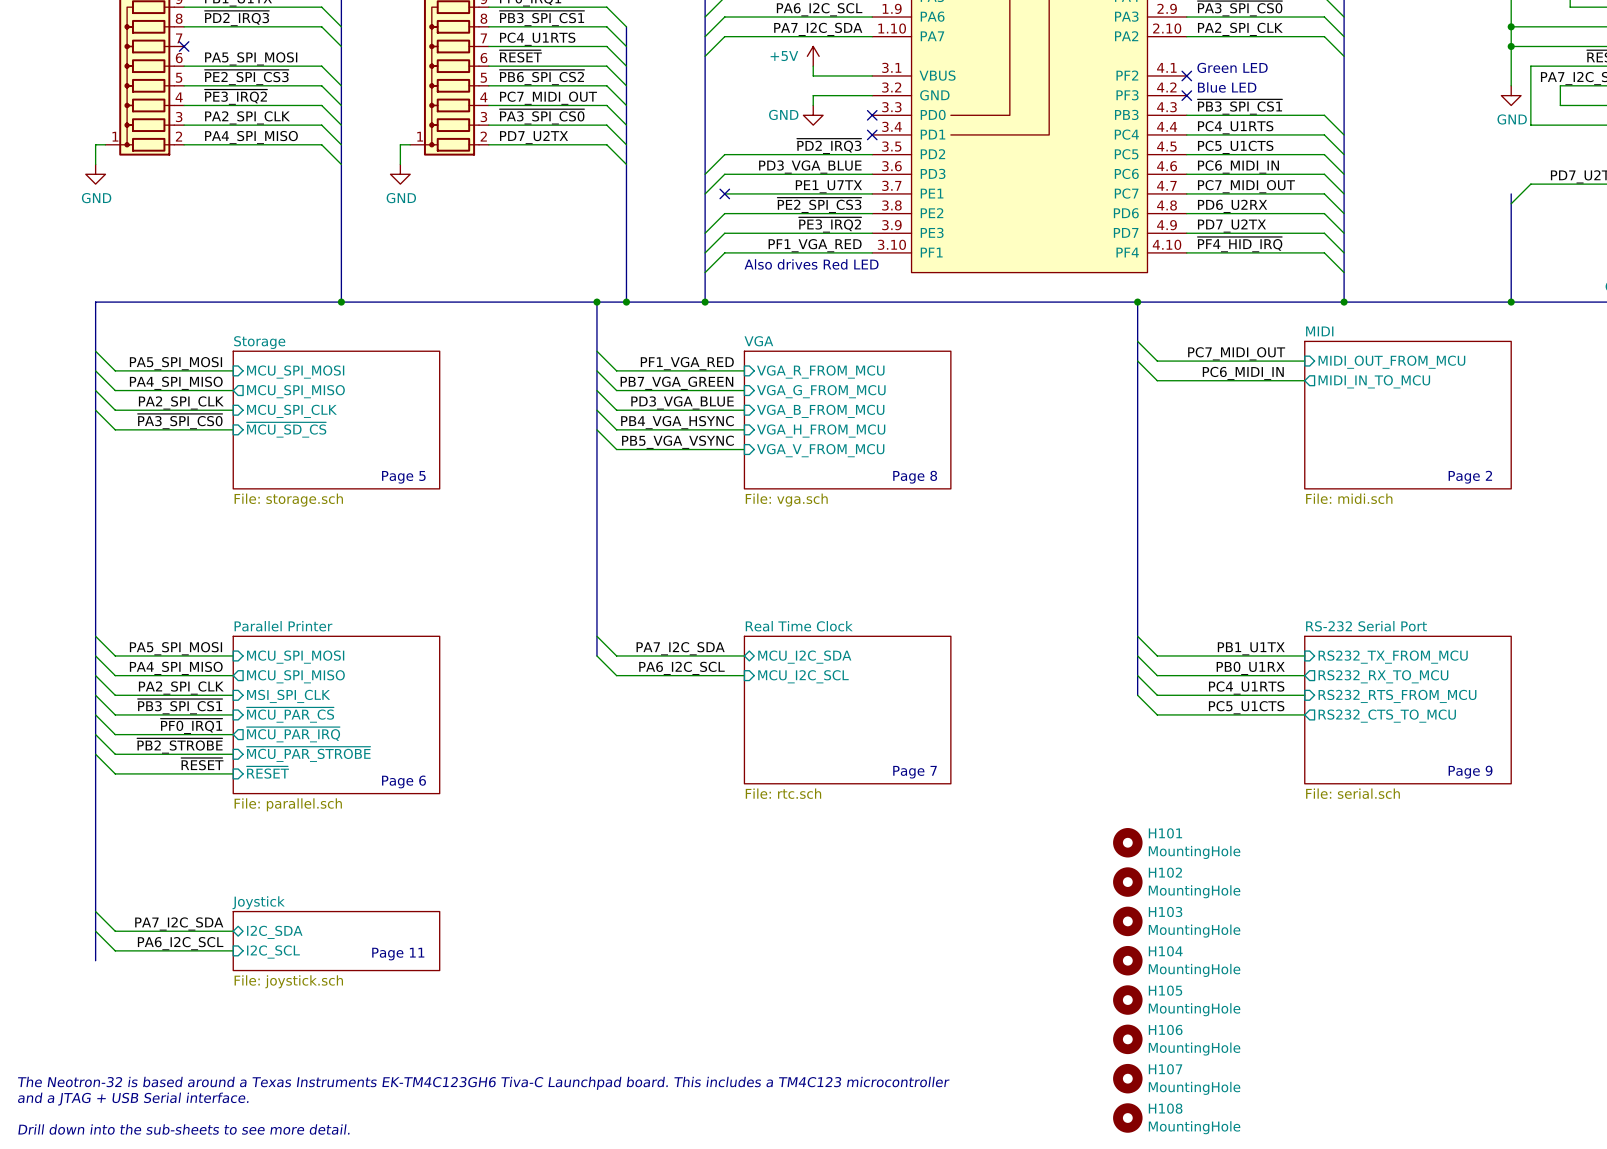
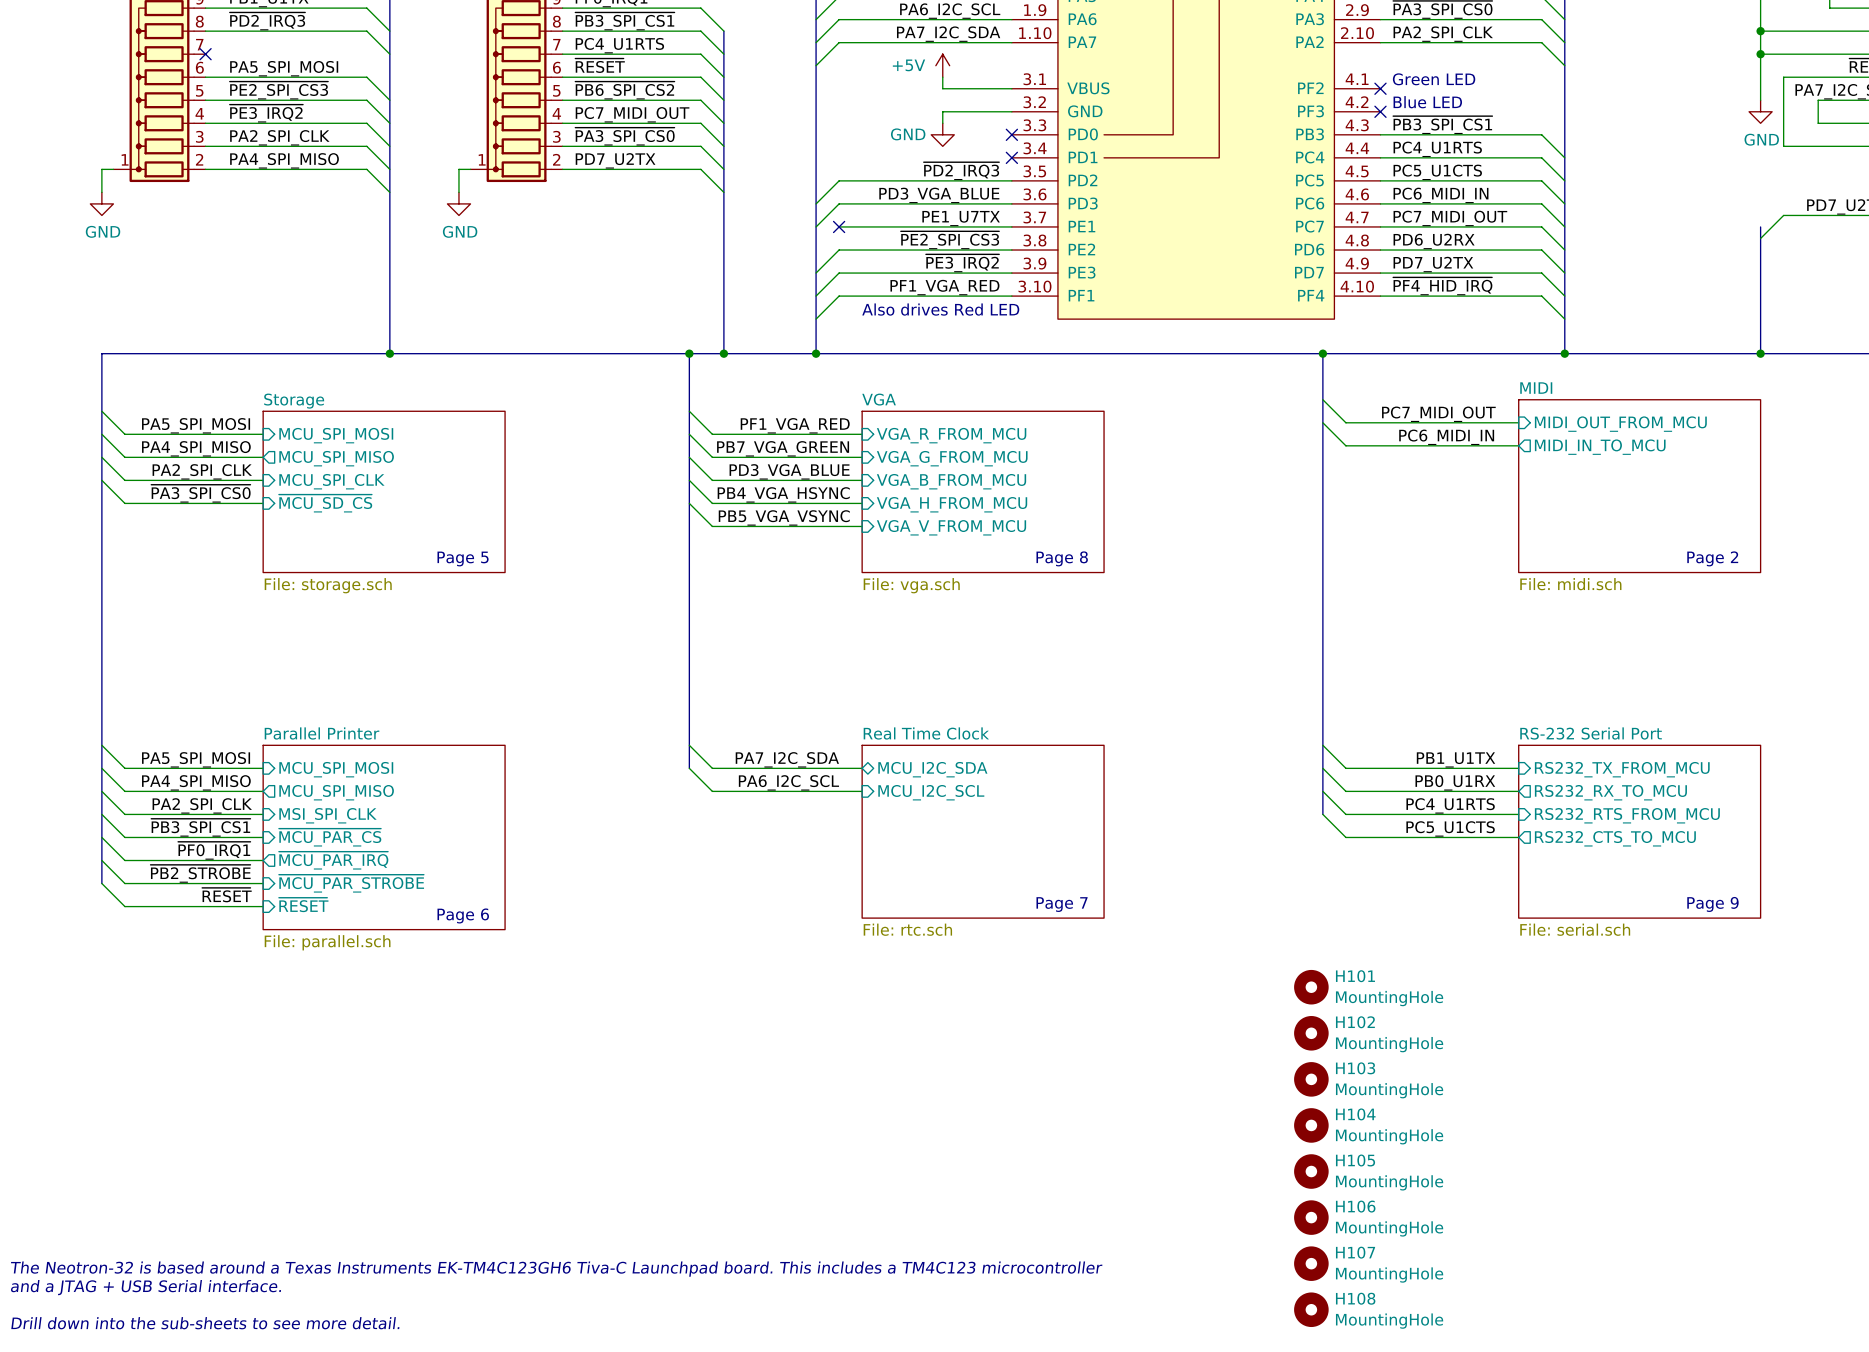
bus: (95, 754) (95, 960) -> none
wire: (95, 911) (115, 931) (233, 931) -> none
label: PA7_I2C_SDA (179, 923) -> none
wire: (95, 931) (115, 950) (233, 950) -> none
sheet pin: I2C_SDA (274, 932) -> none
sheet Joystick: File: joystick.sch (336, 941) -> none
label: PA6_I2C_SCL (180, 943) -> none
sheet pin: I2C_SCL (273, 952) -> none
text: Page 11 (398, 954) -> none

